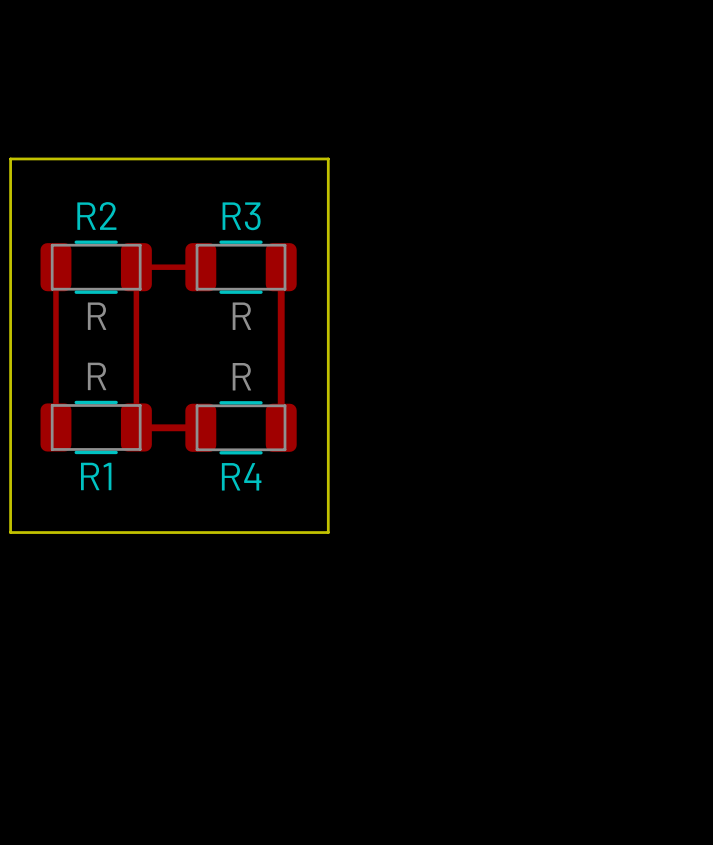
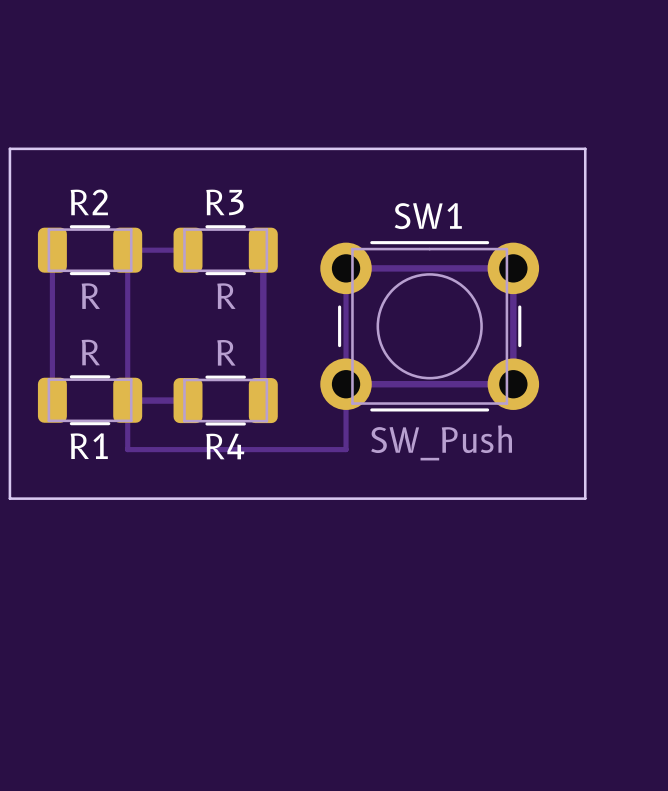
board edge: (328, 158) (328, 532) -> (307, 148) (585, 148) (585, 498) (307, 498)
SW1: none -> SW_Push (429, 326)
track: none -> (346, 384) (513, 384) (513, 268) (346, 268) (346, 449) (127, 449)
track: none -> (127, 400) (127, 449)

